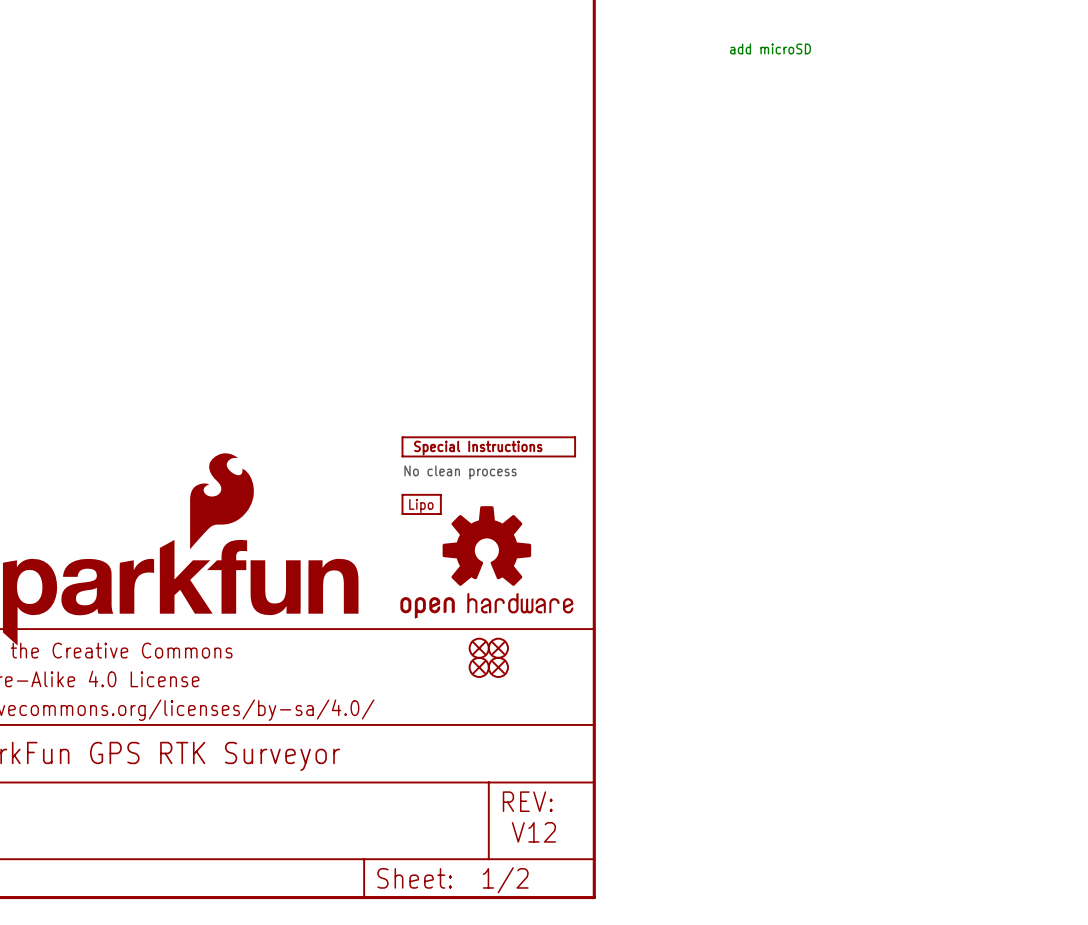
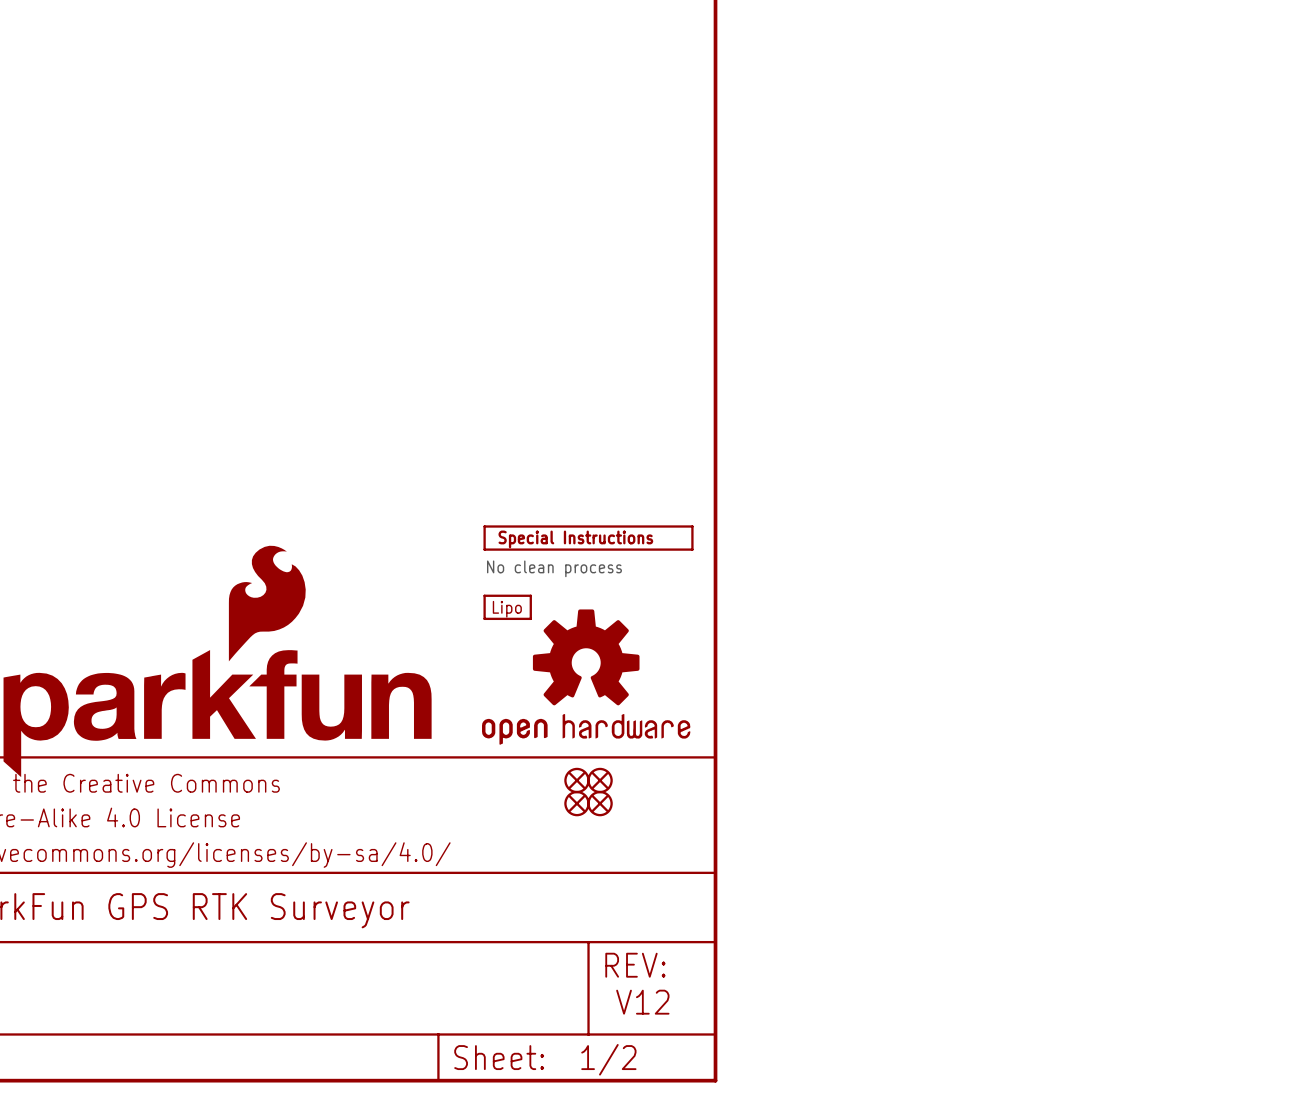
text: add microSD (770, 48) -> none

